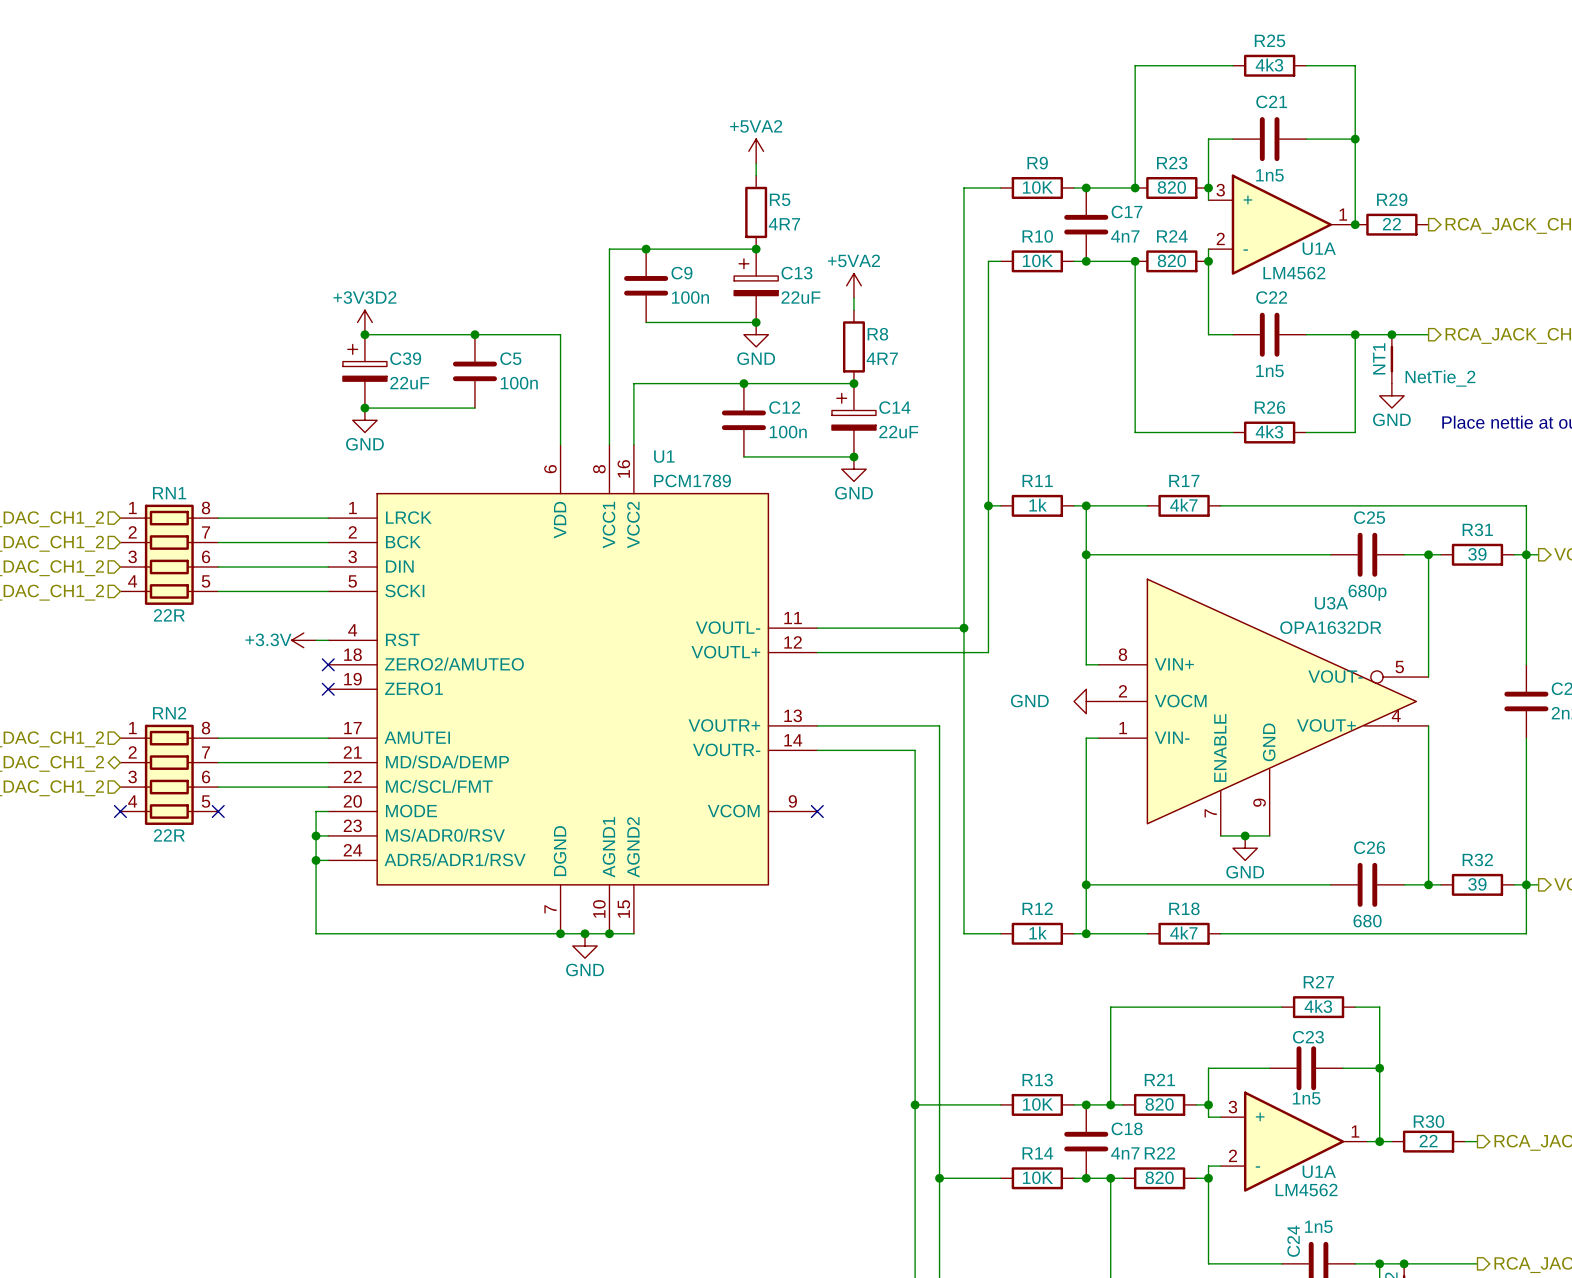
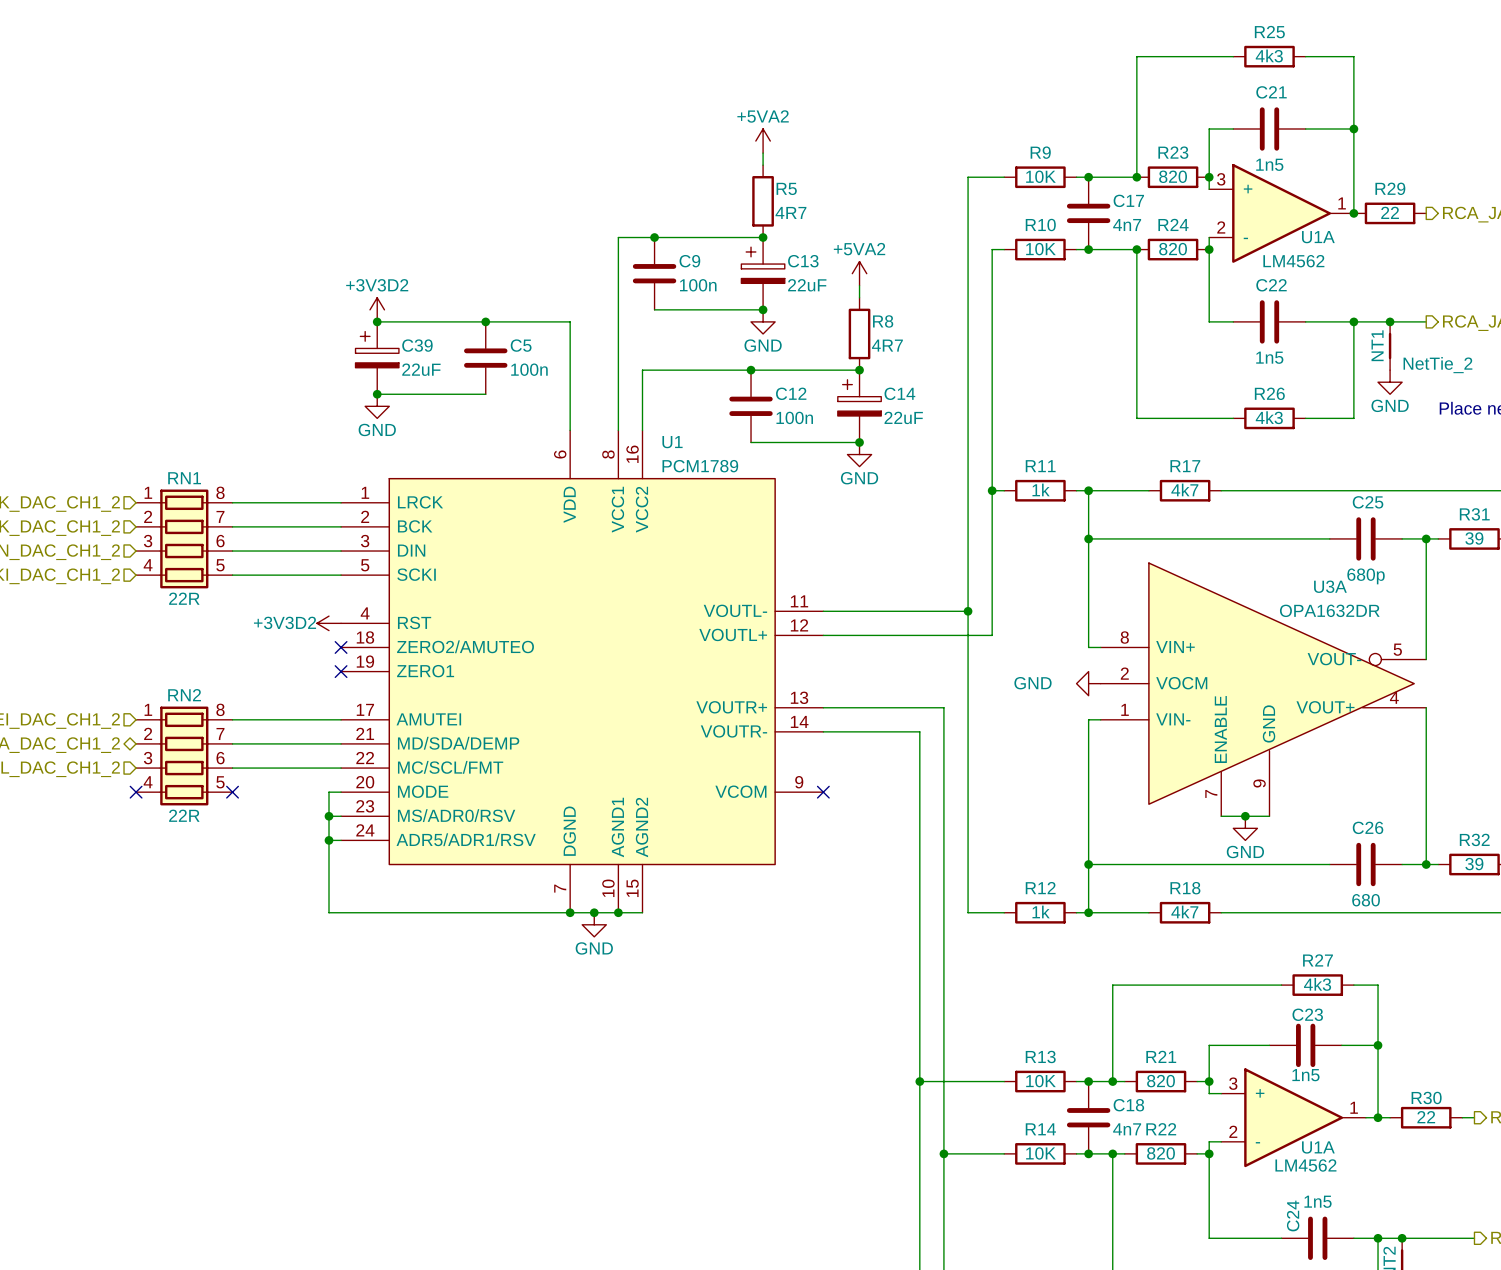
power symbol: +3.3V (303, 640) -> none
power symbol: none -> +3V3D2 (329, 623)

